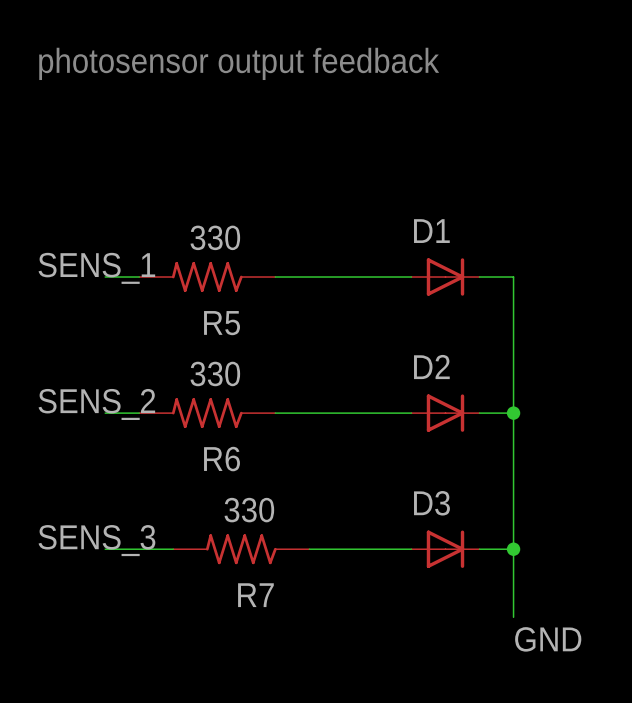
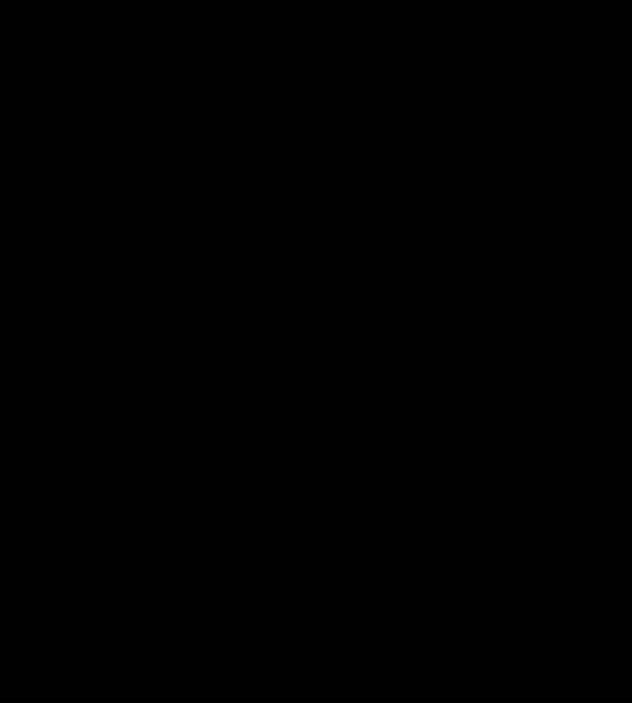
text: photosensor output feedback (239, 63) -> none
label: SENS_1 (96, 268) -> none
wire: (105, 277) (139, 277) -> none
R5: 330 (207, 277) -> none
wire: (275, 277) (411, 277) -> none
D1: (445, 277) -> none
wire: (479, 277) (513, 277) (513, 617) -> none
label: SENS_2 (96, 404) -> none
wire: (105, 413) (139, 413) -> none
R6: 330 (207, 413) -> none
wire: (275, 413) (411, 413) -> none
D2: (445, 413) -> none
wire: (479, 413) (513, 413) -> none
junction: (513, 413) -> none
label: SENS_3 (96, 540) -> none
wire: (105, 549) (173, 549) -> none
R7: 330 (241, 549) -> none
wire: (309, 549) (411, 549) -> none
D3: (445, 549) -> none
wire: (479, 549) (513, 549) -> none
junction: (513, 549) -> none
label: GND (548, 639) -> none

